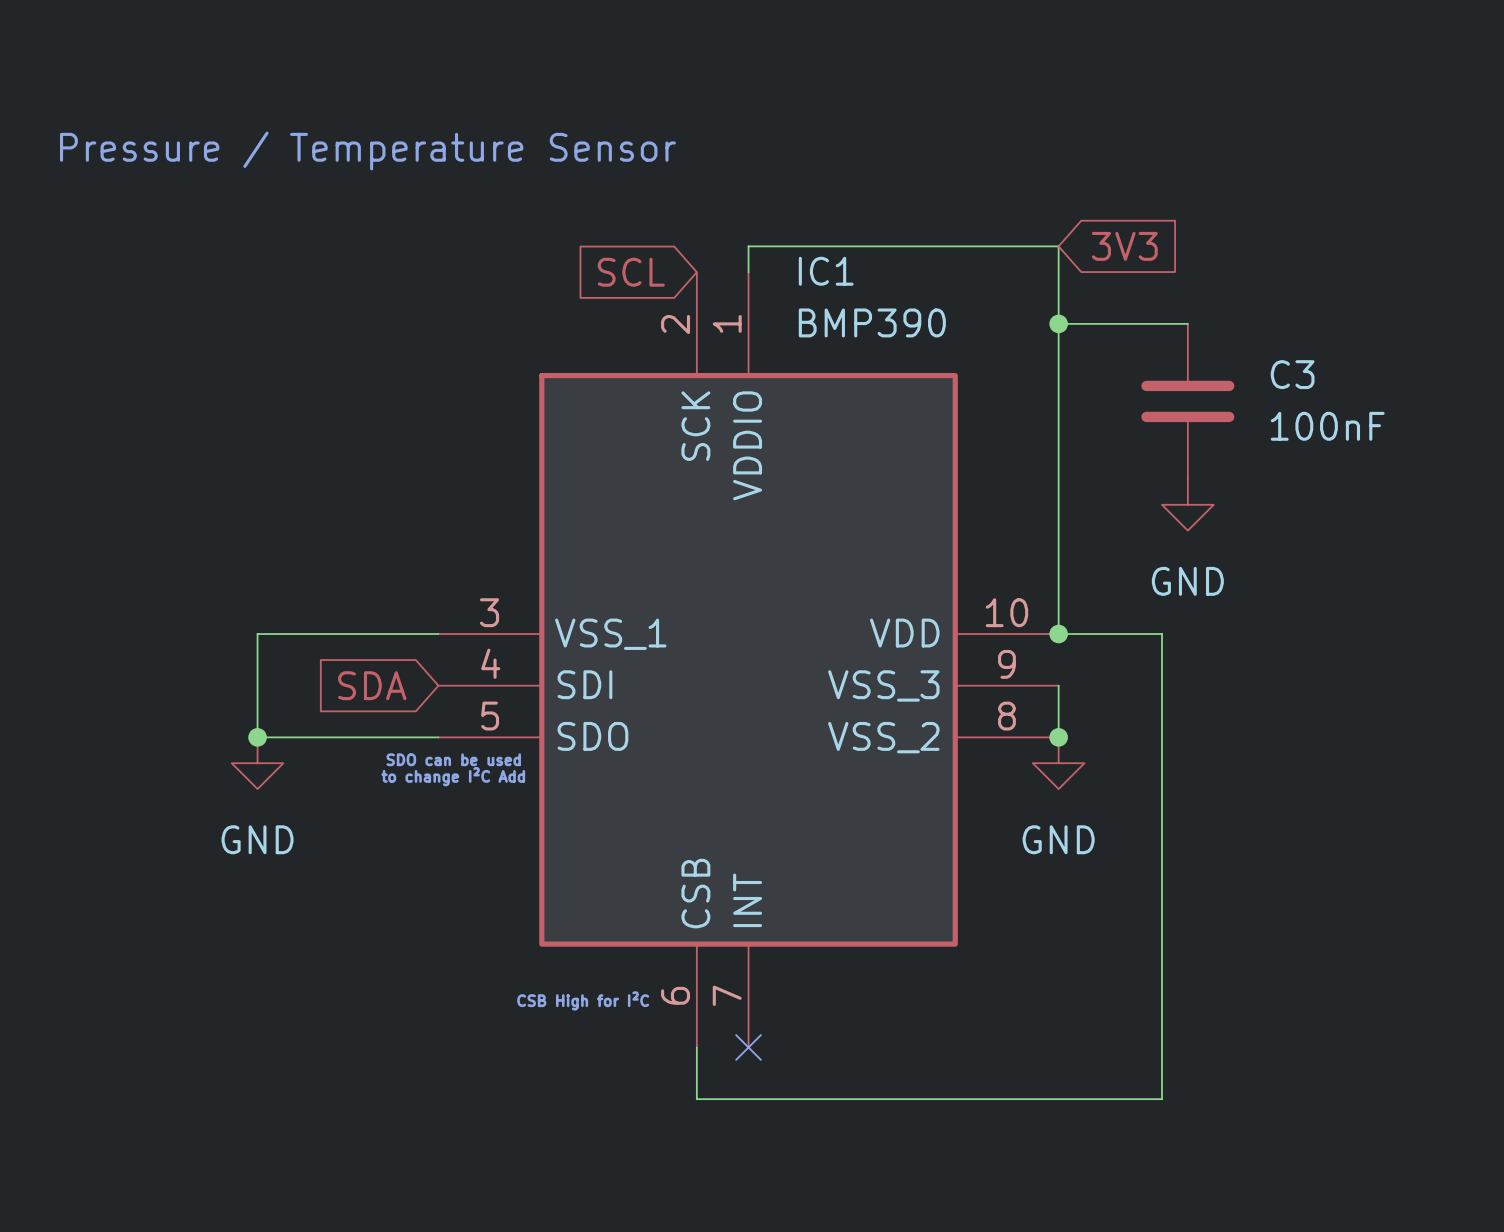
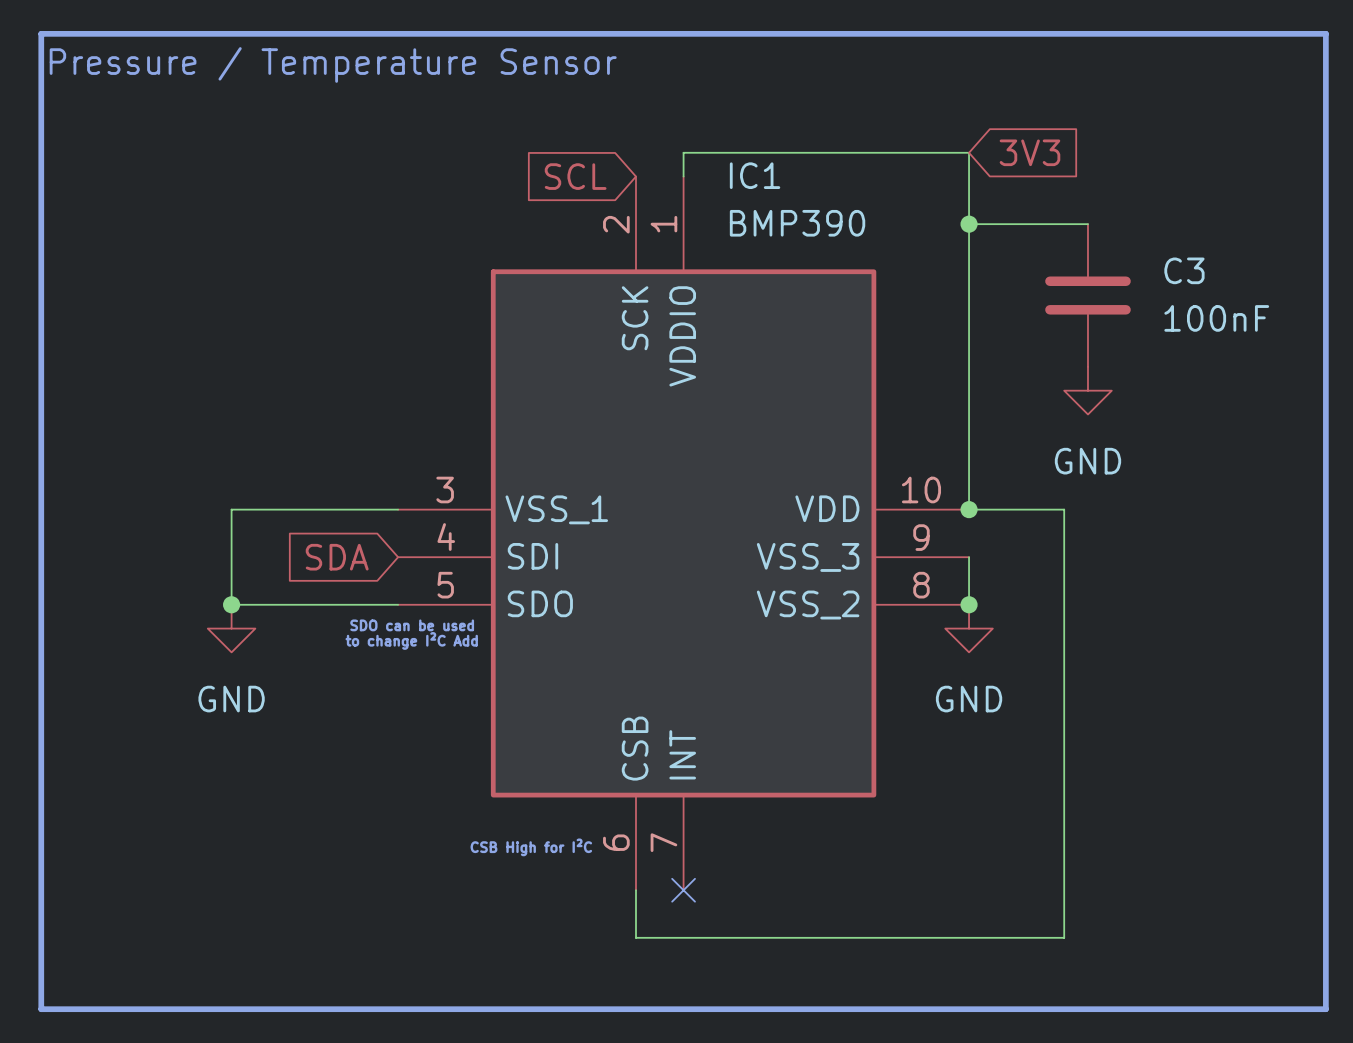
line: none -> (41, 33) (1325, 33) (1325, 1009) (41, 1009) (41, 33)

